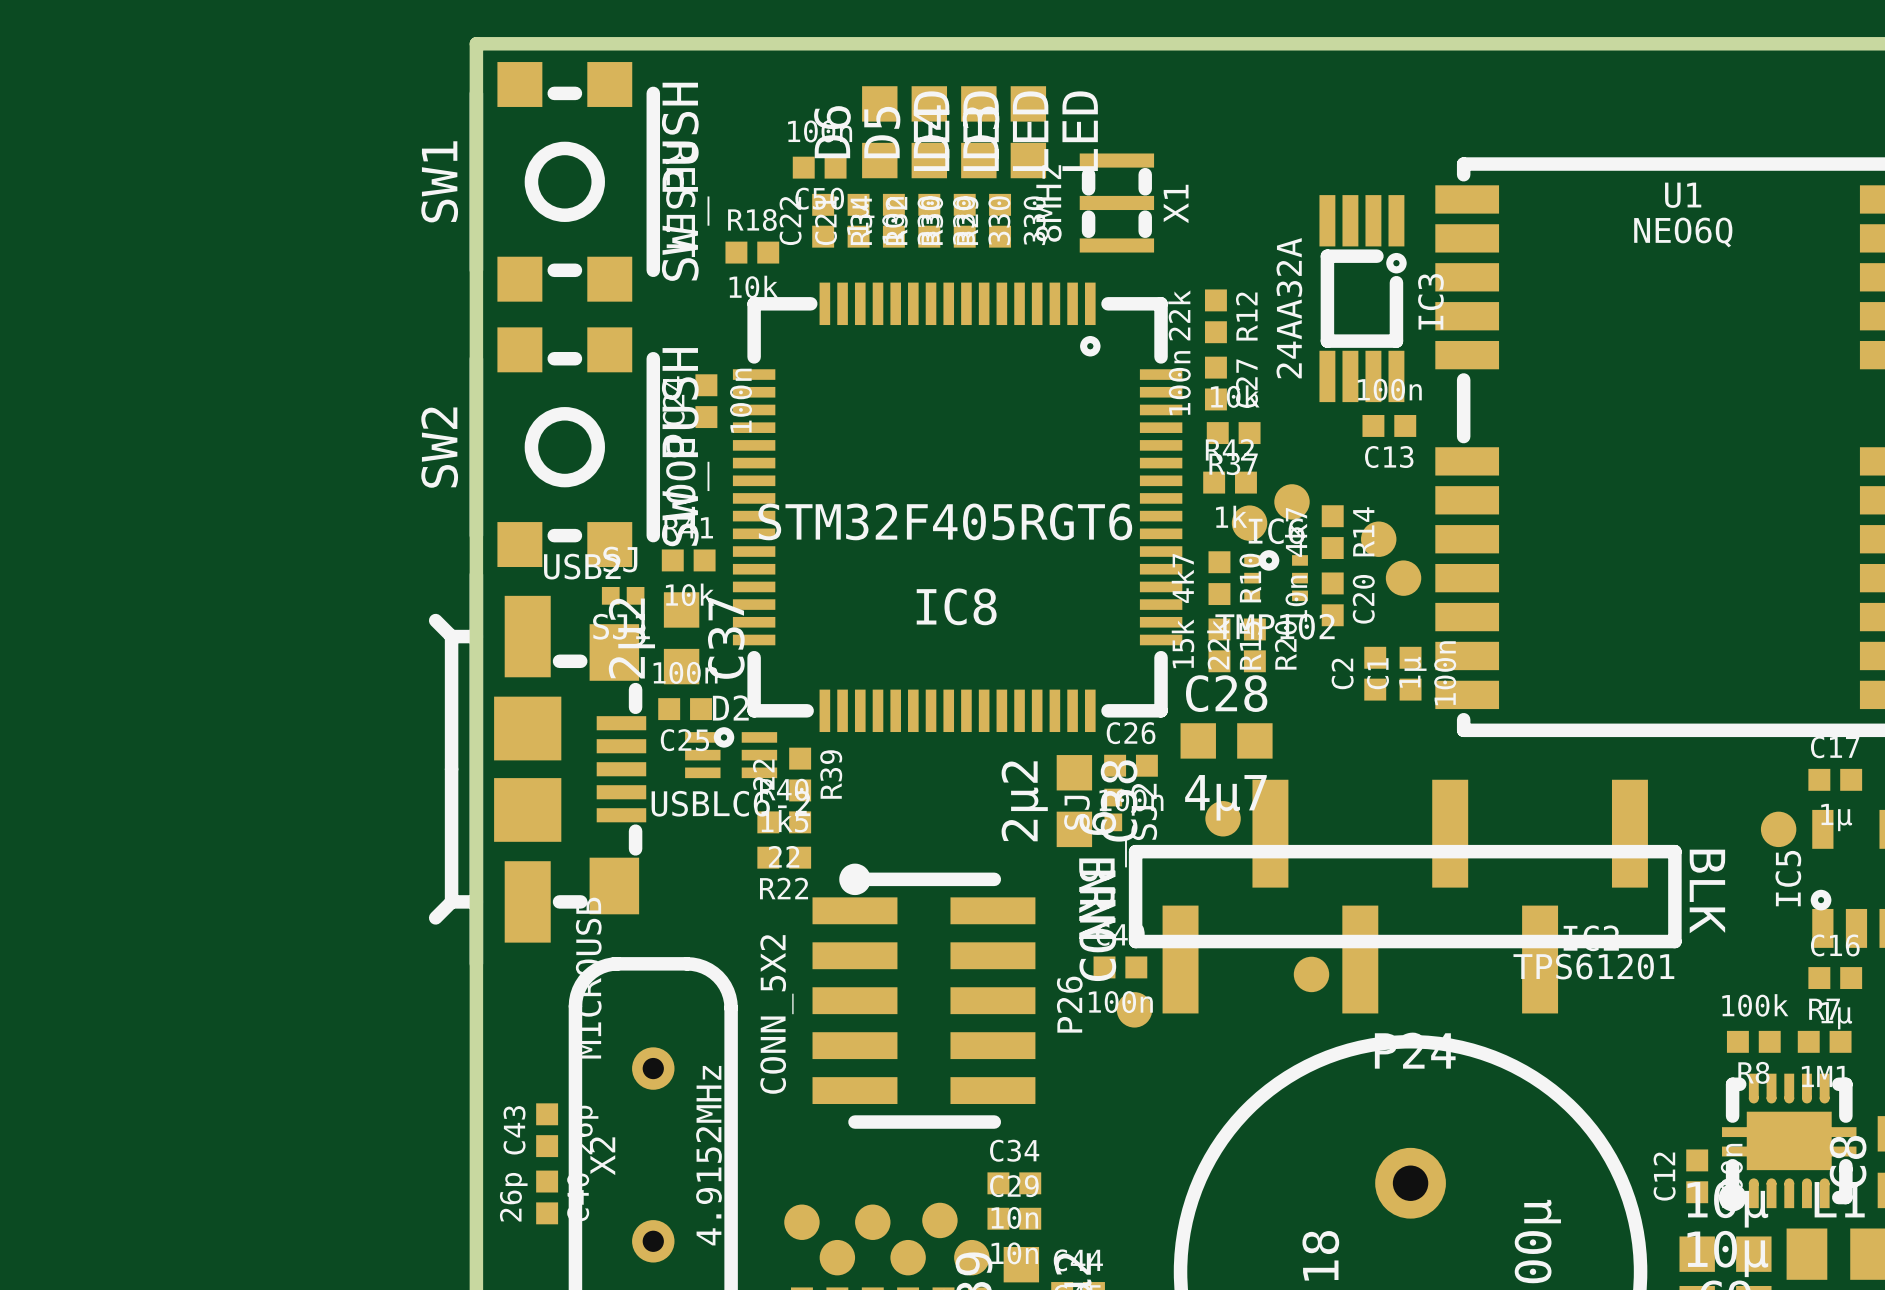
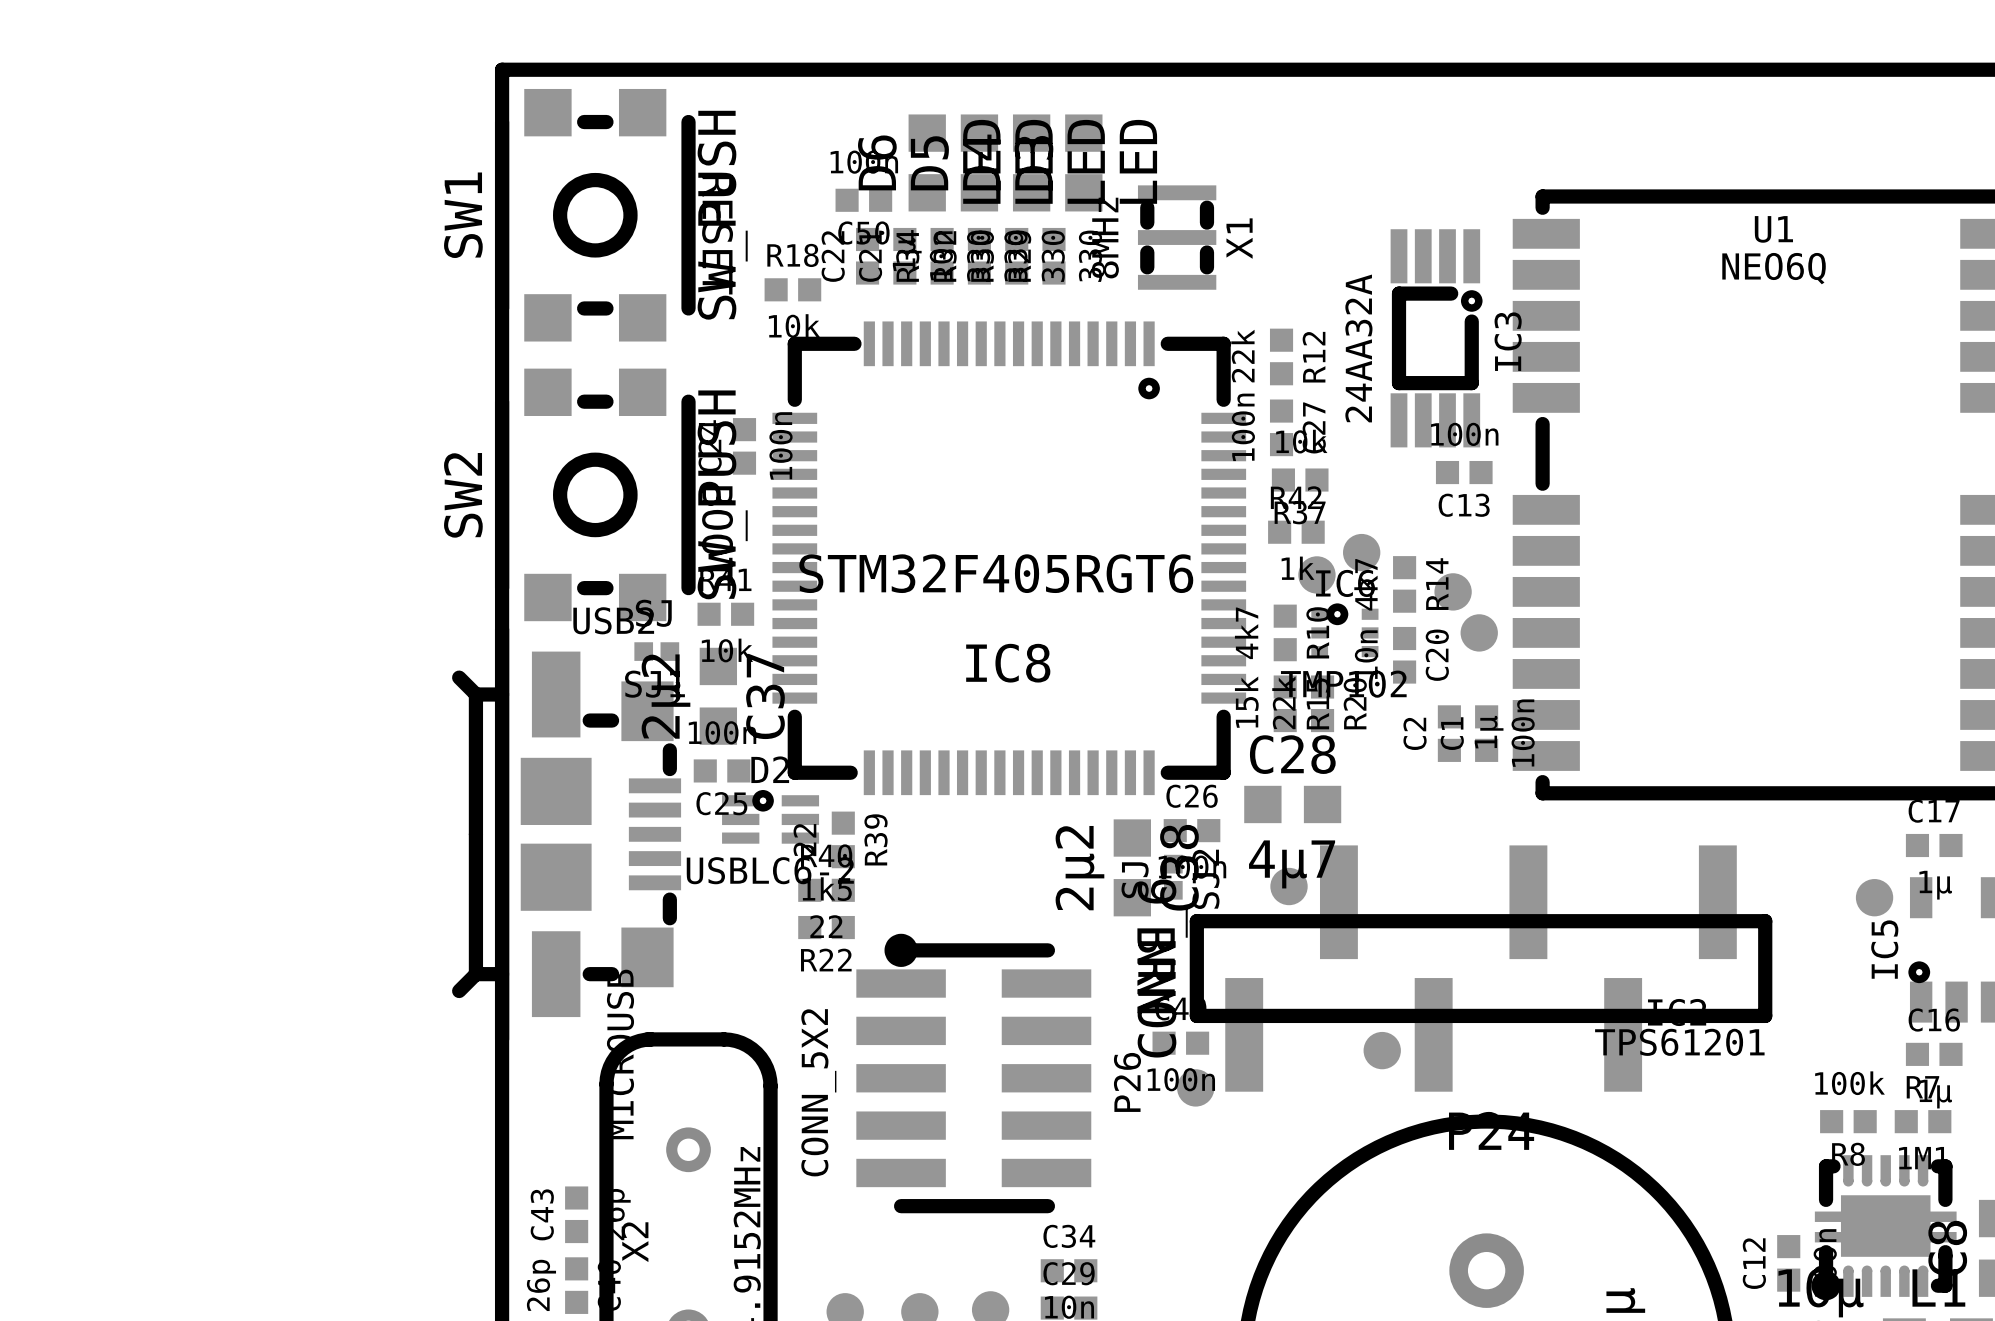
text: BLK (1707, 891) -> none

